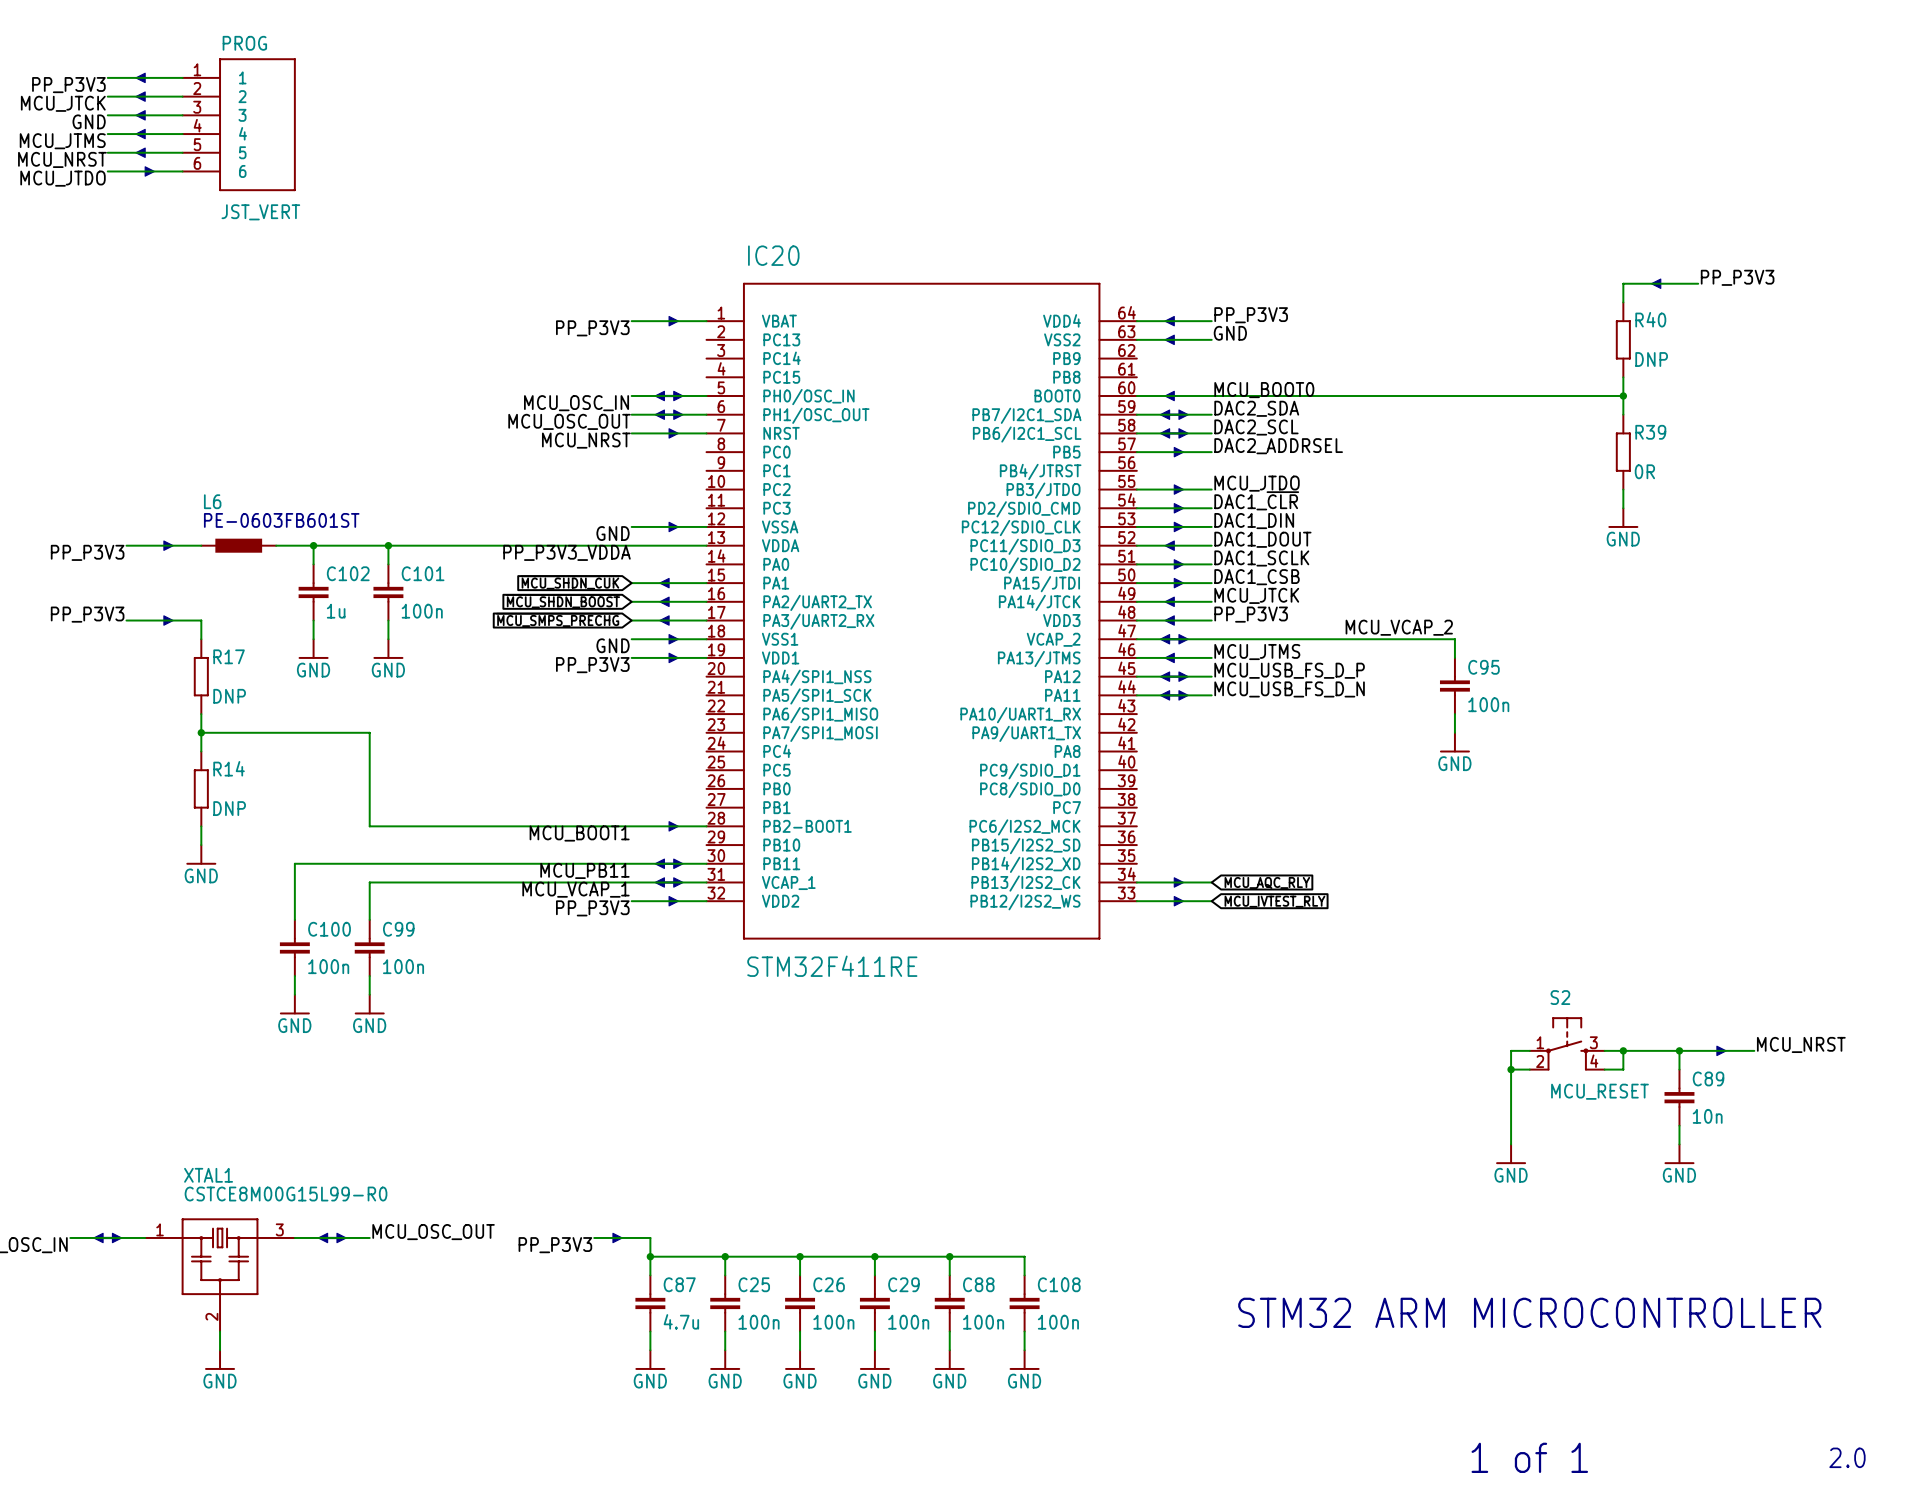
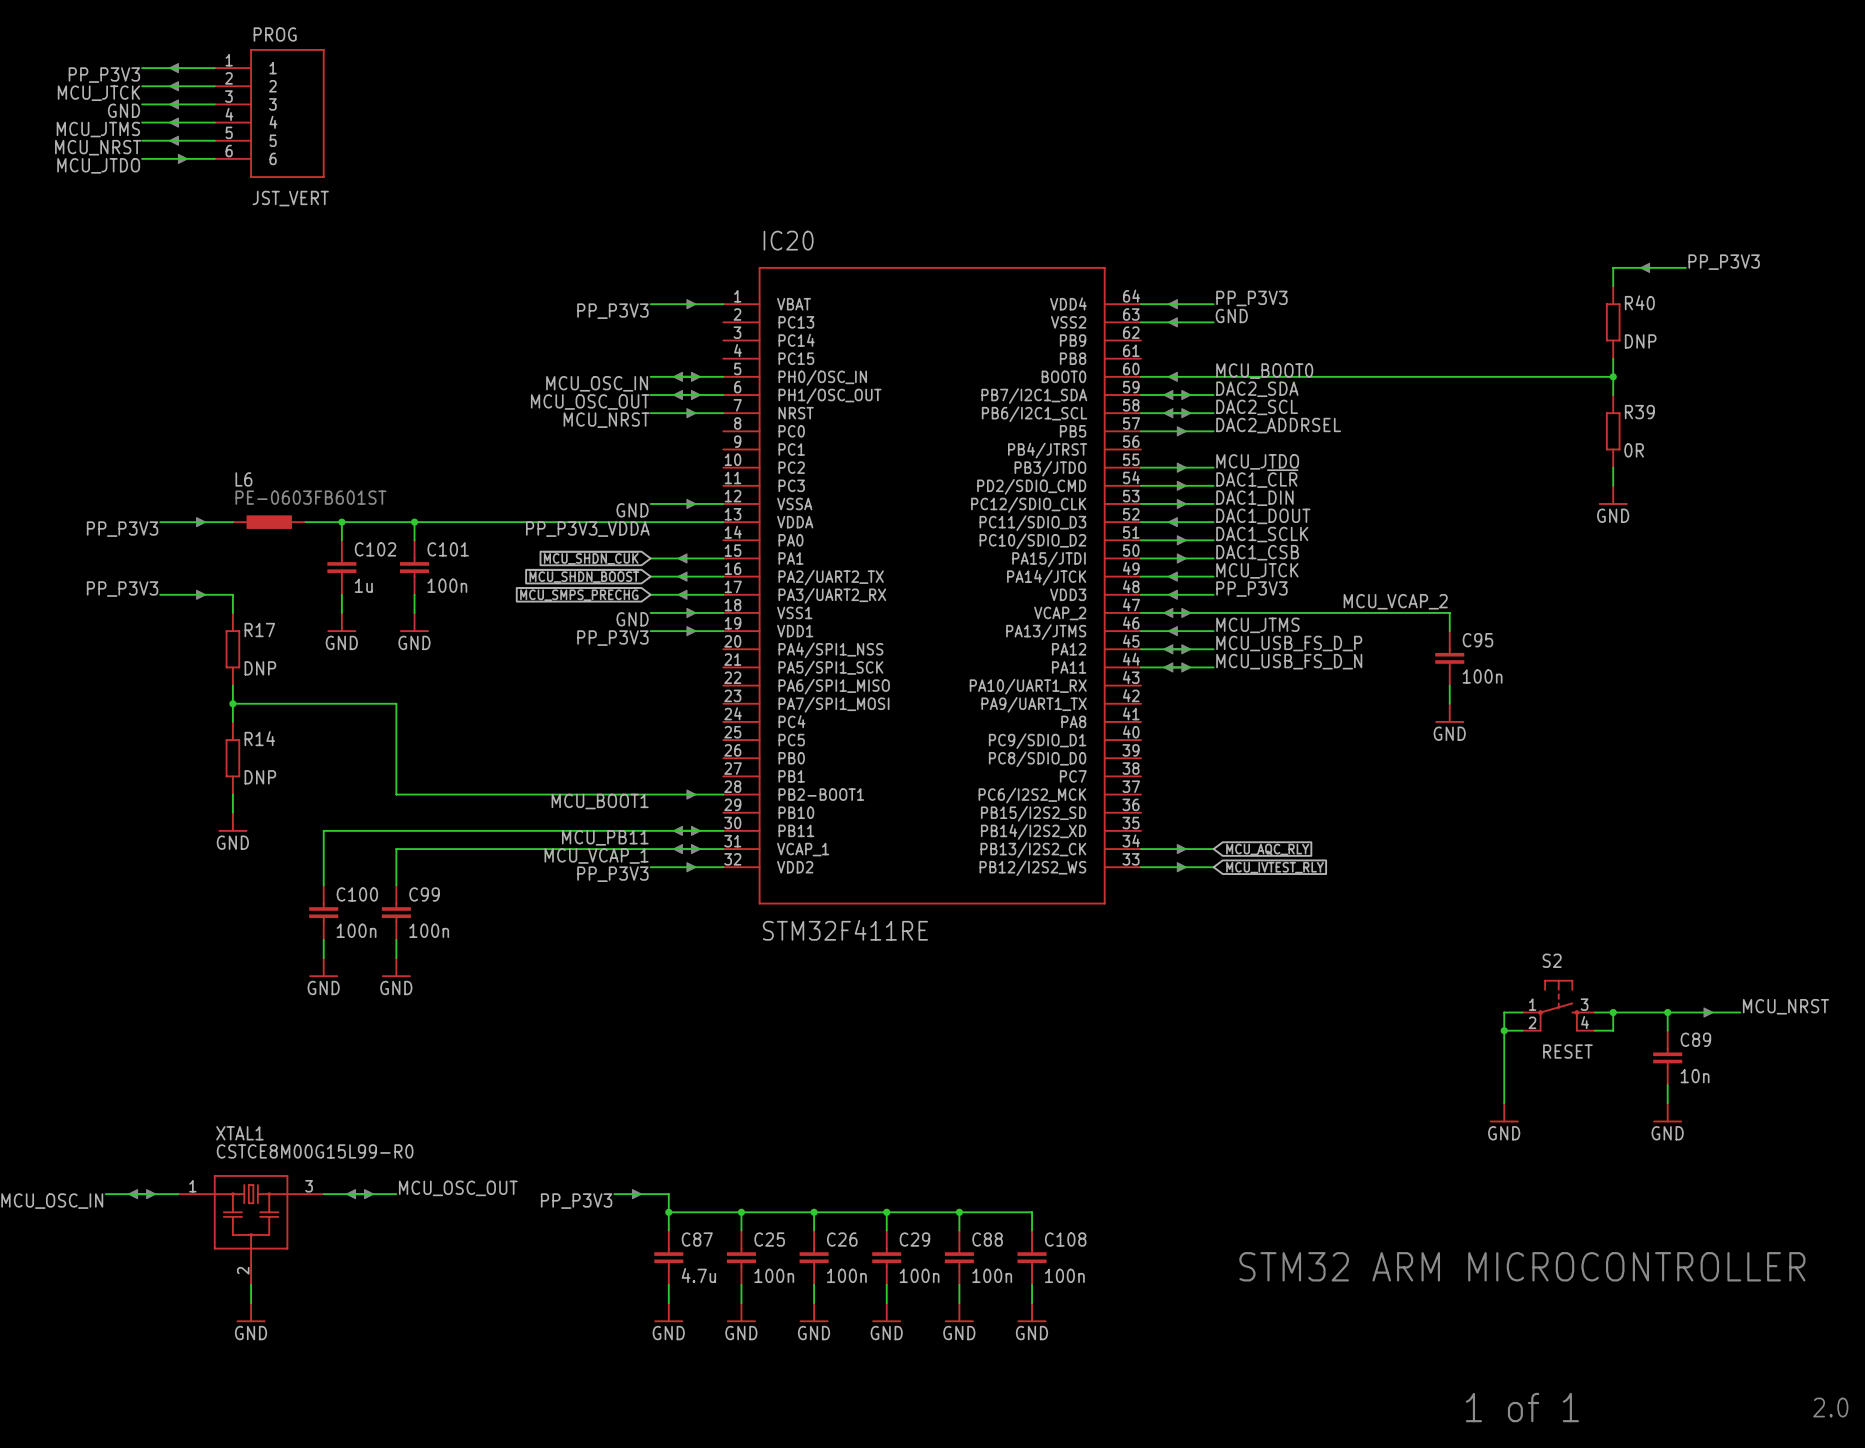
S2 value: MCU_RESET (1599, 1091) -> RESET (1567, 1051)

